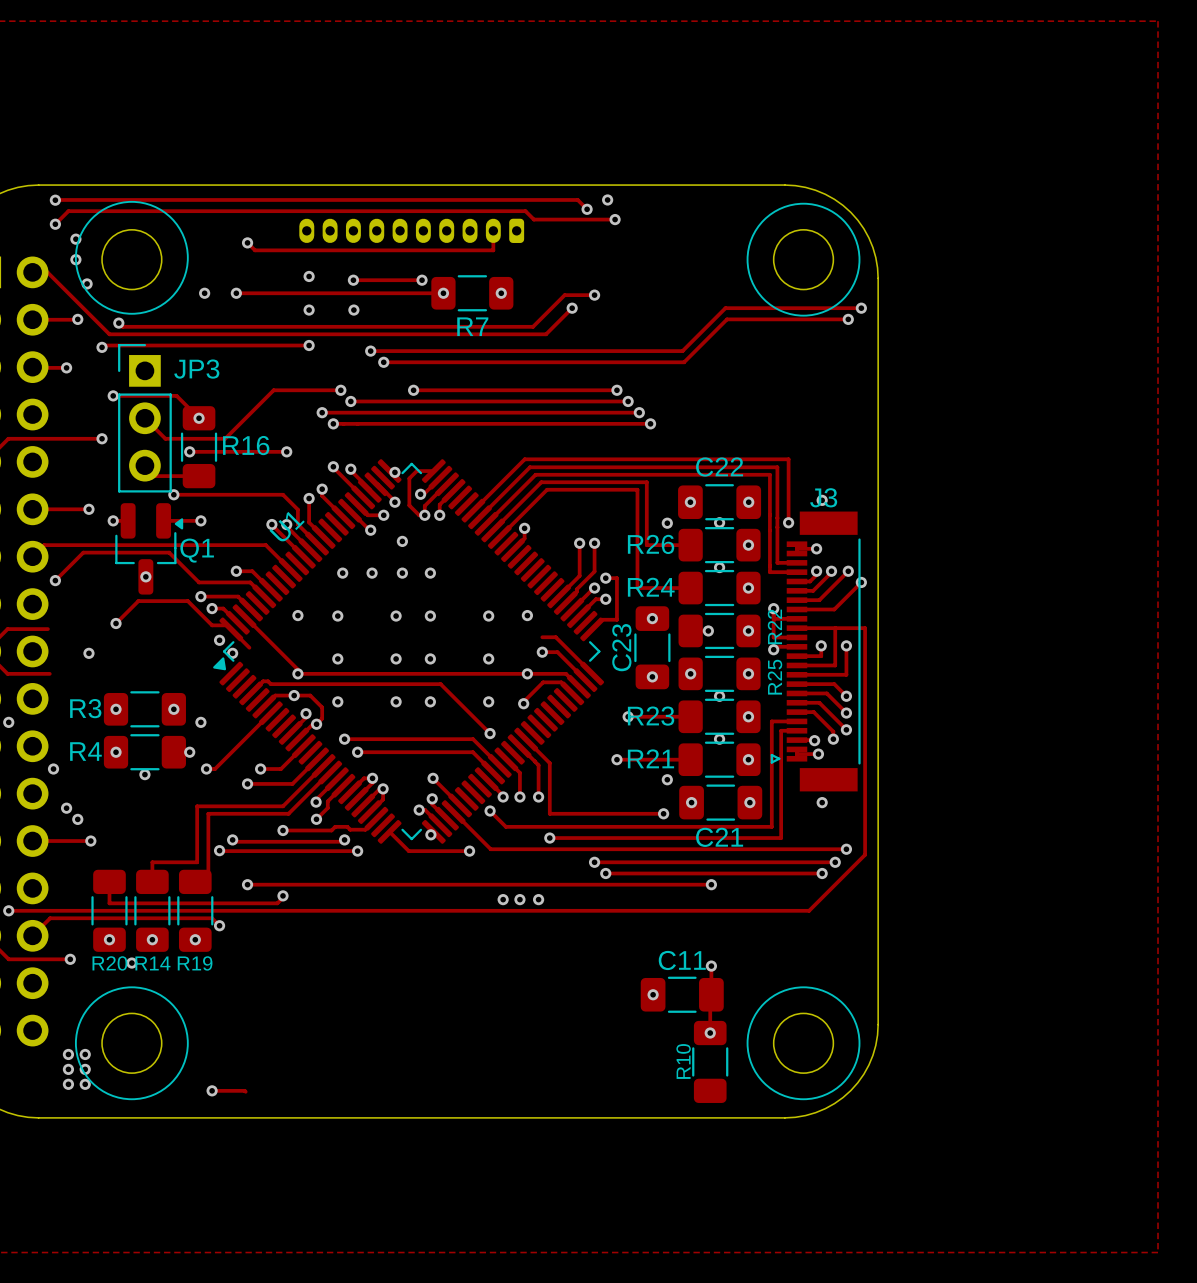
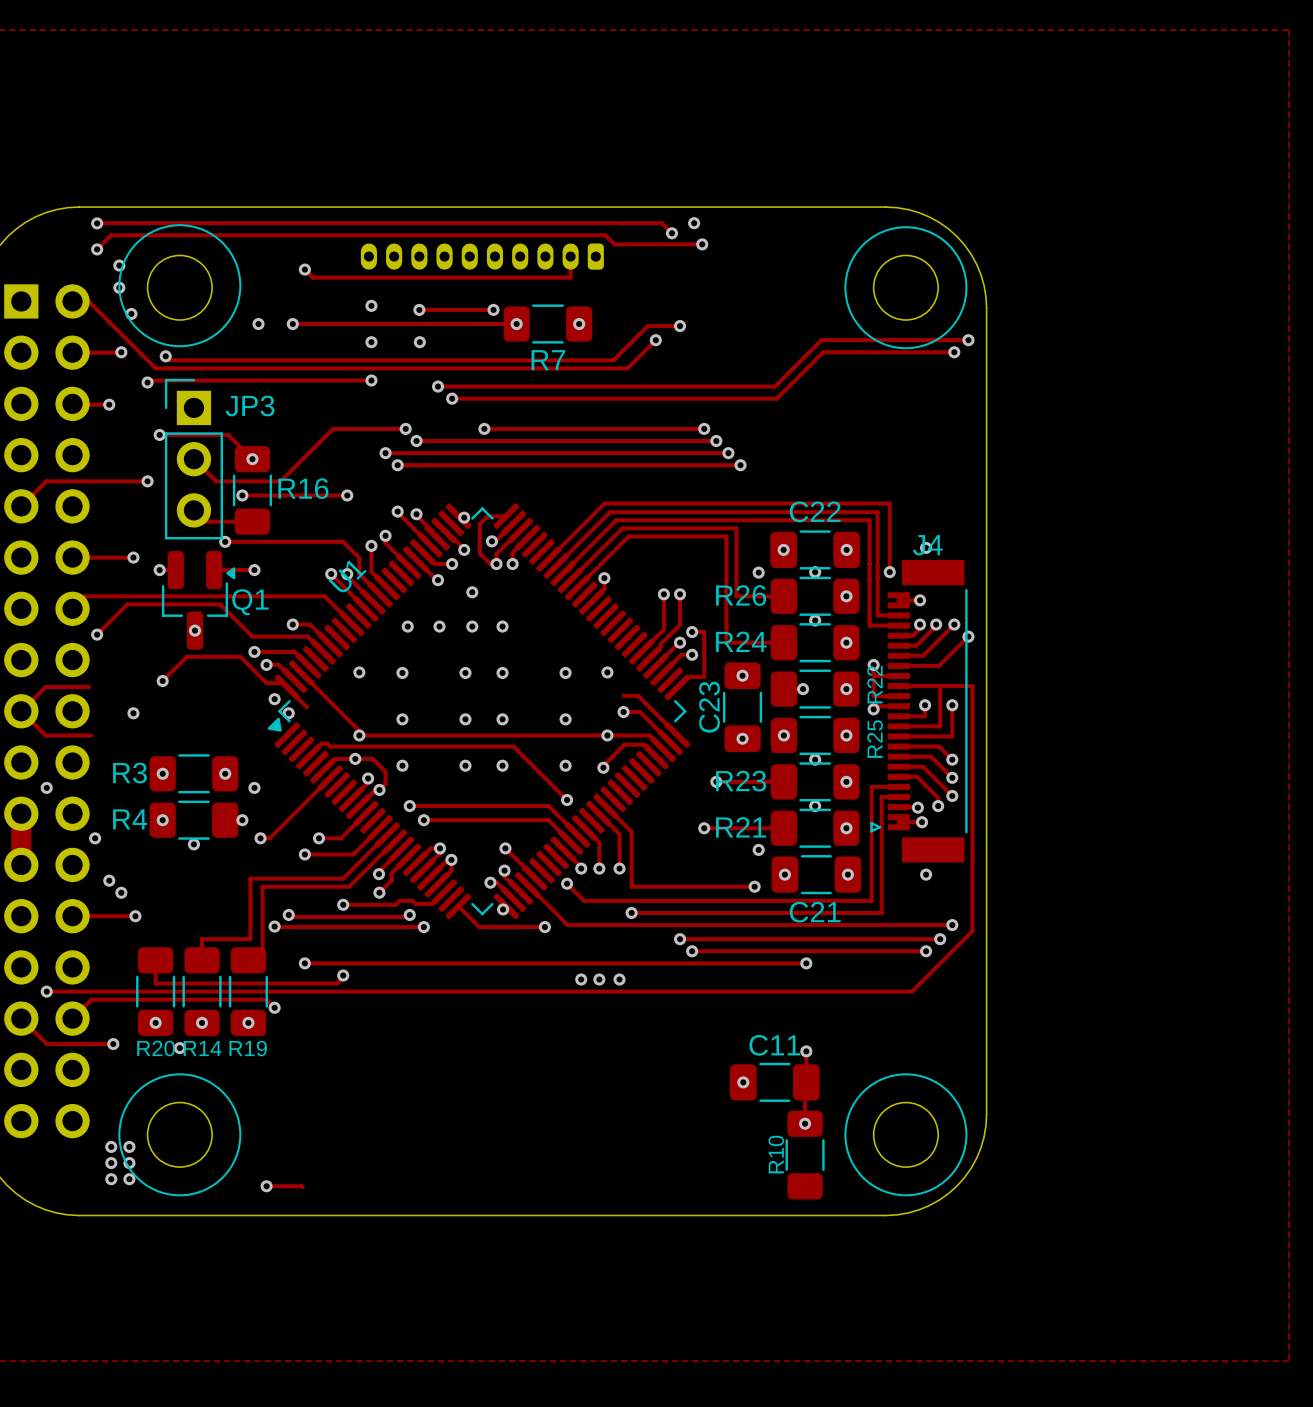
J3 name: J3 (823, 497) -> J4 (927, 545)

